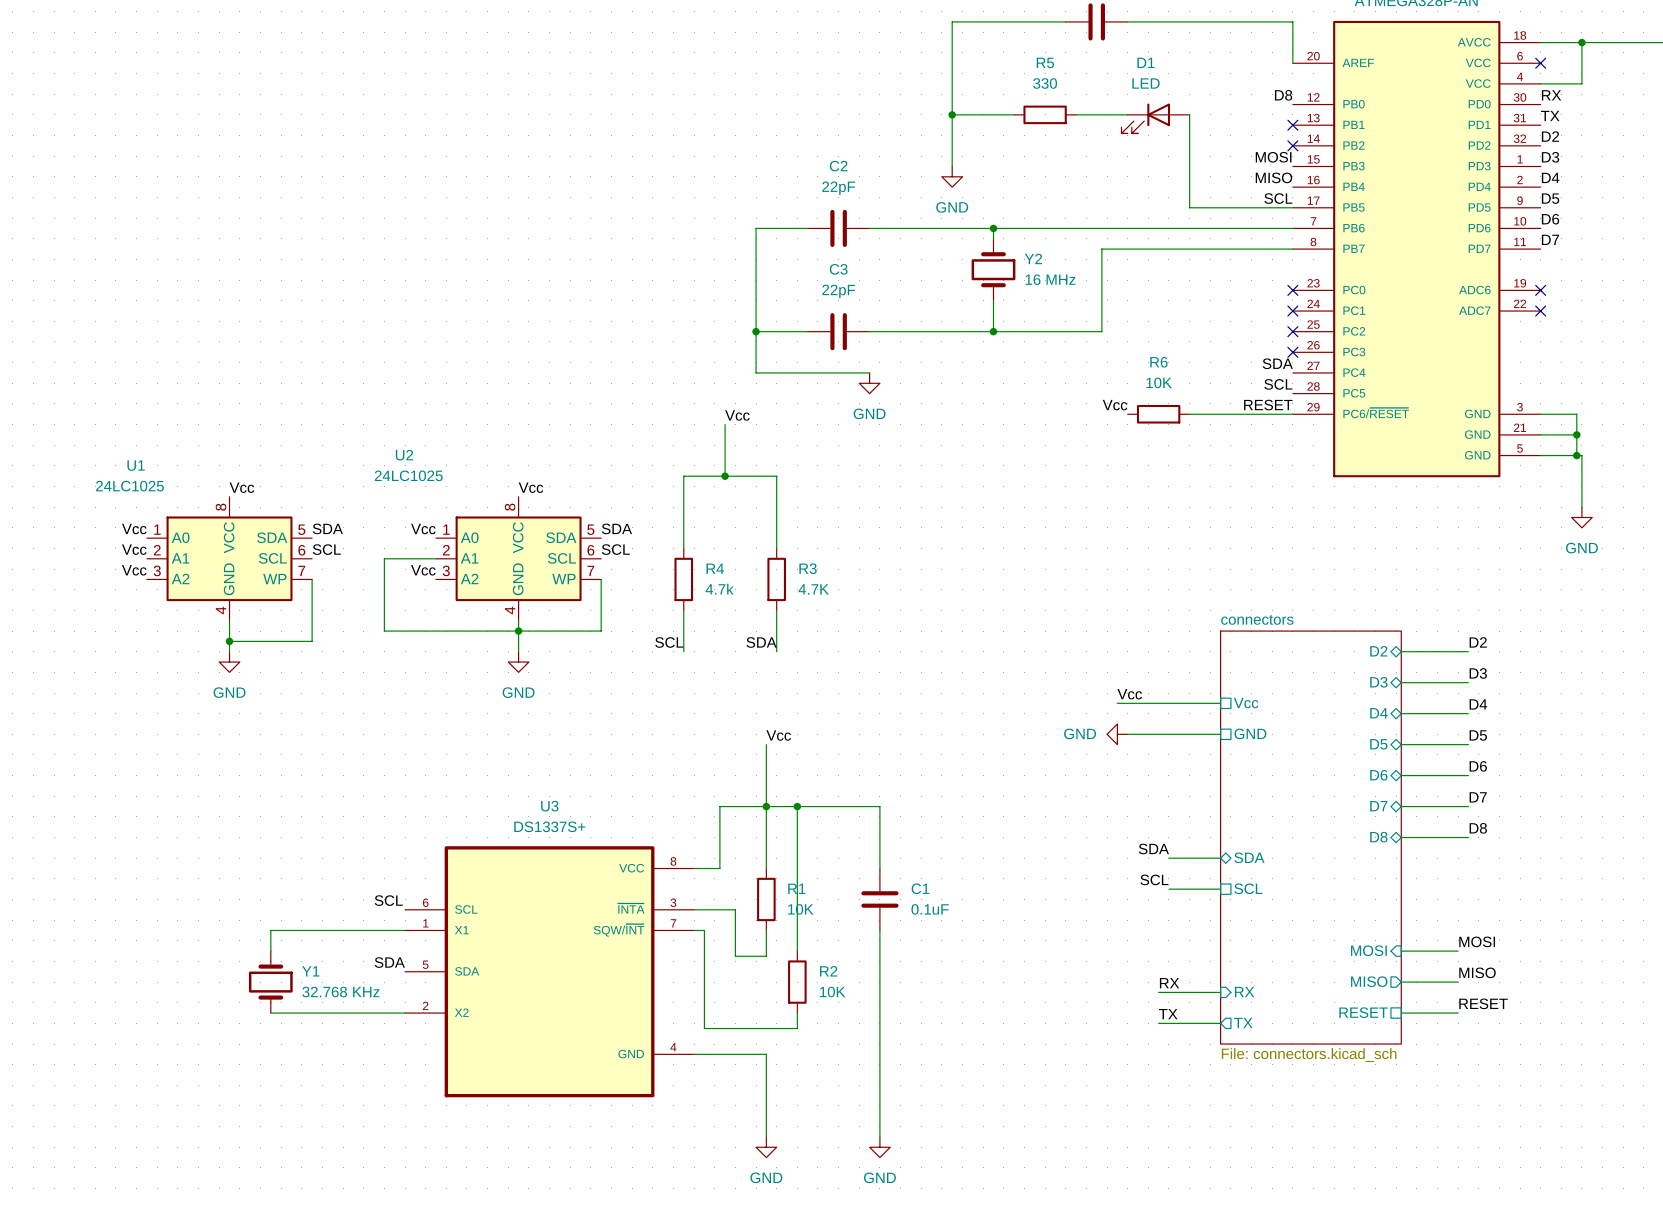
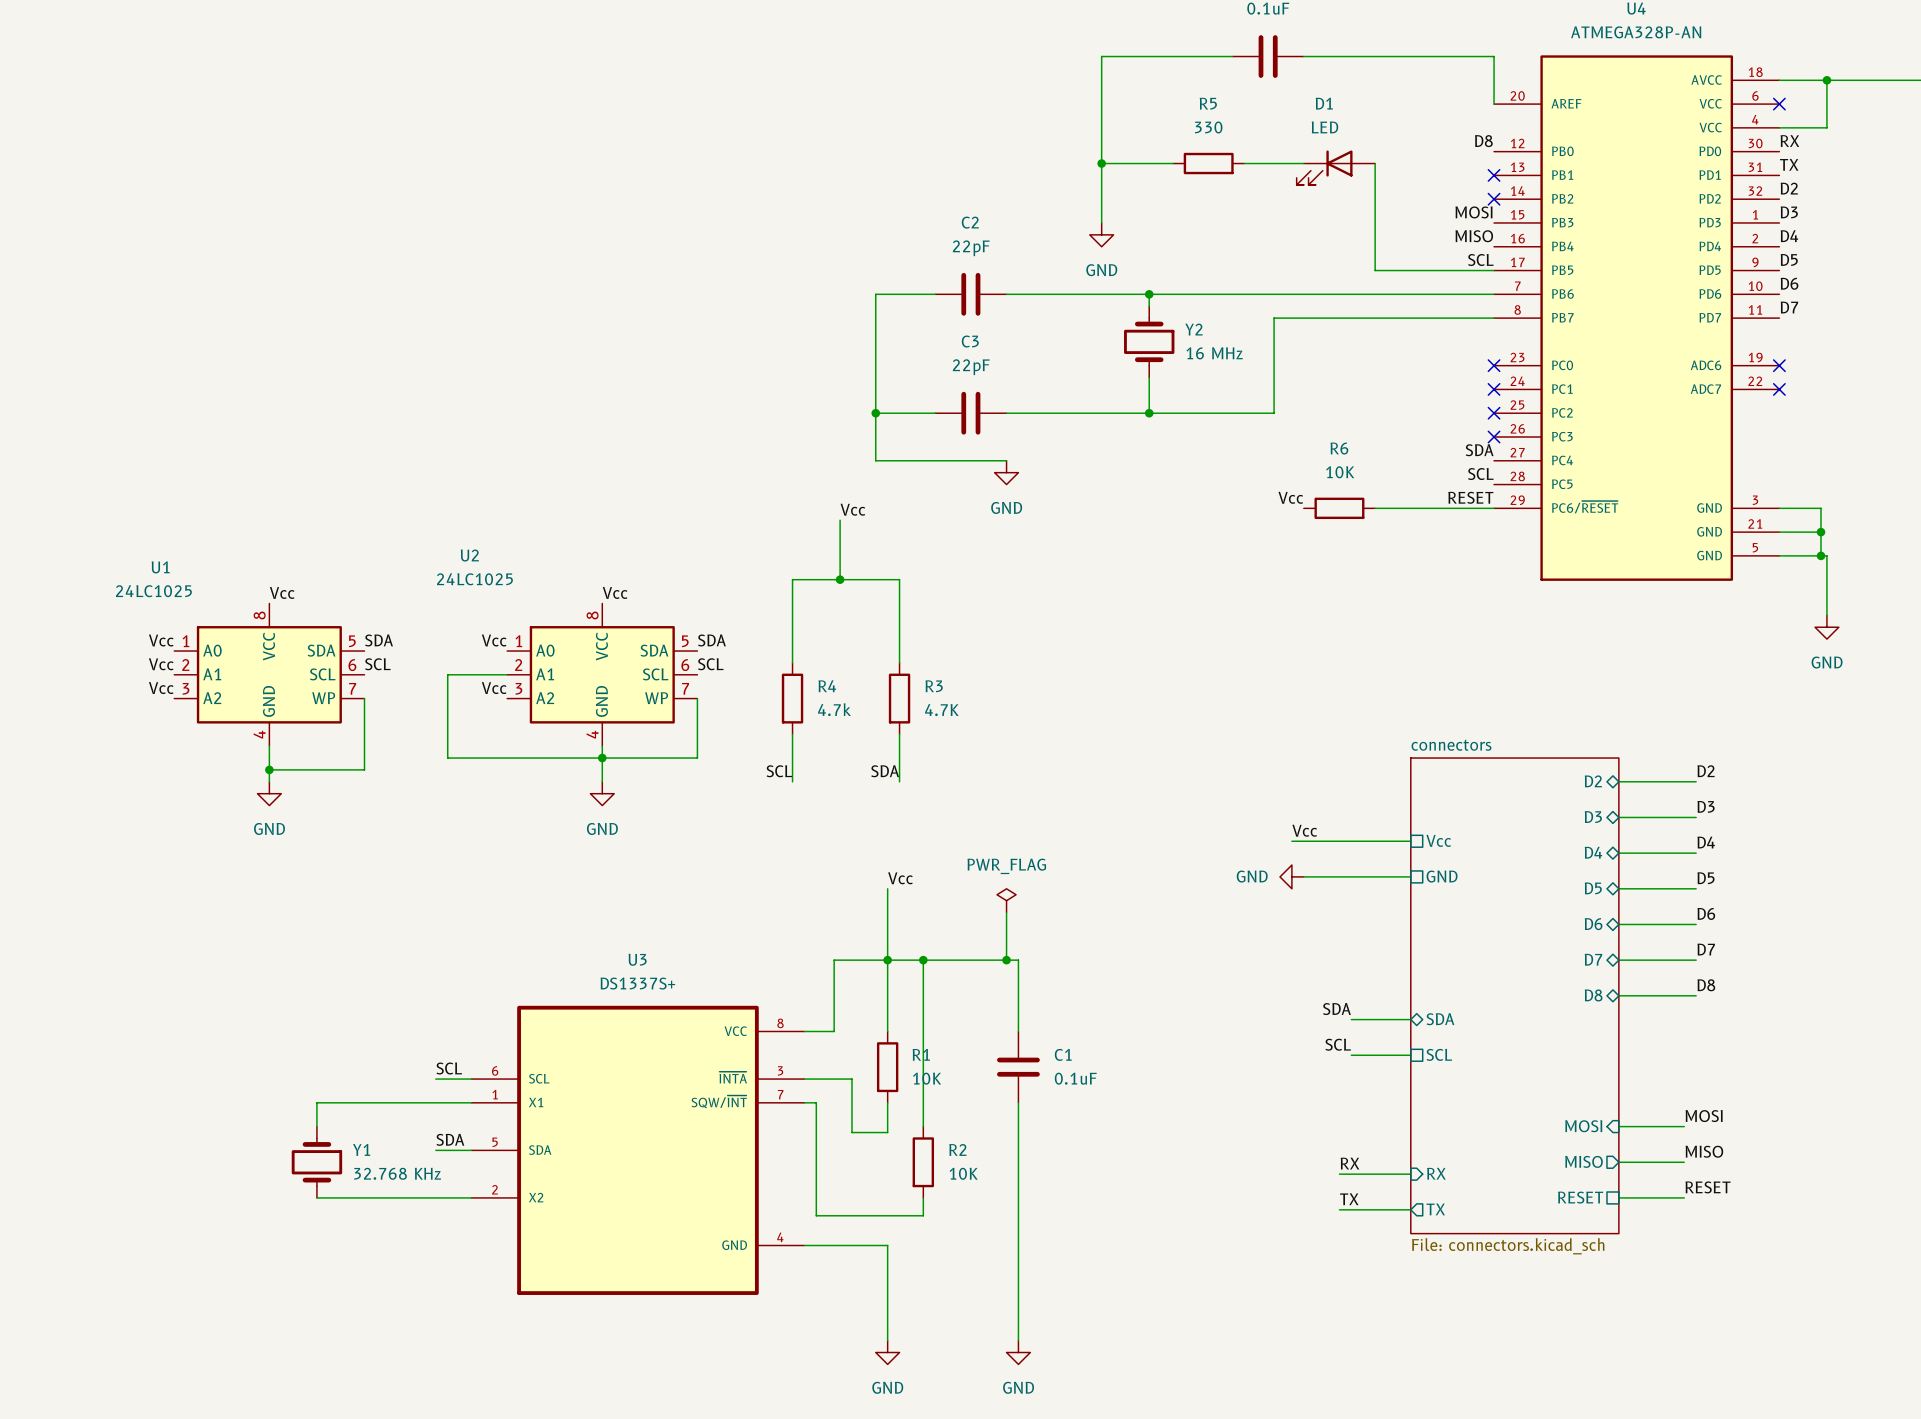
power symbol: none -> PWR_FLAG (1006, 900)
wire: none -> (1006, 912) (1006, 960)
junction: none -> (1006, 960)
wire: none -> (435, 1079) (471, 1079)
wire: none -> (435, 1150) (471, 1150)

